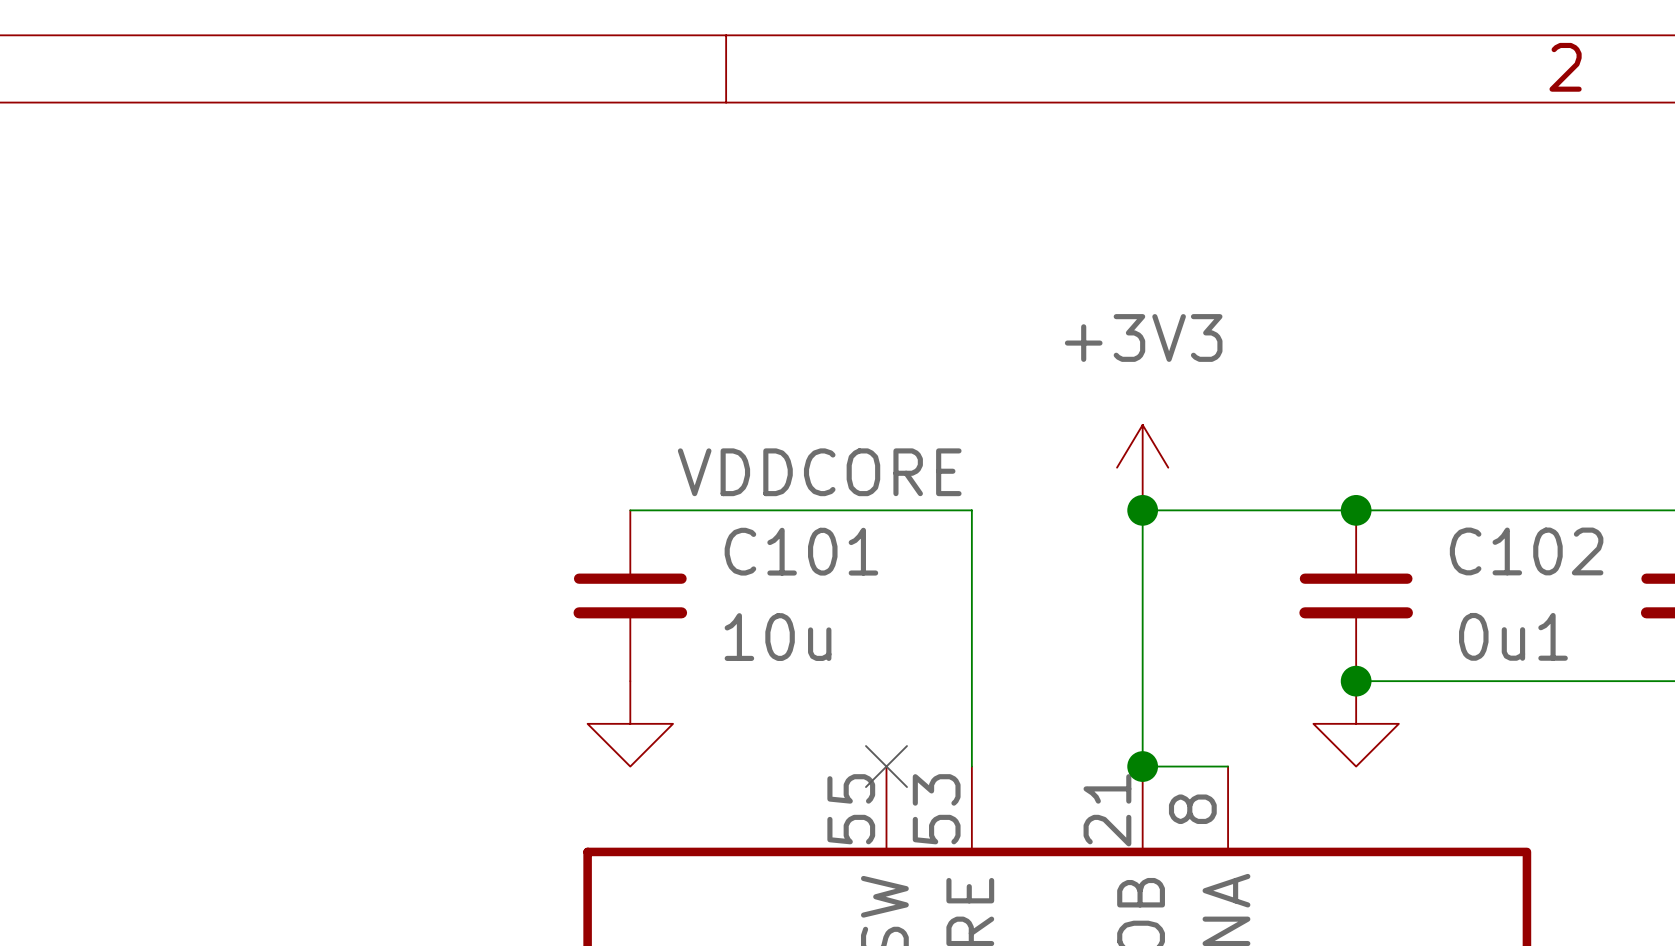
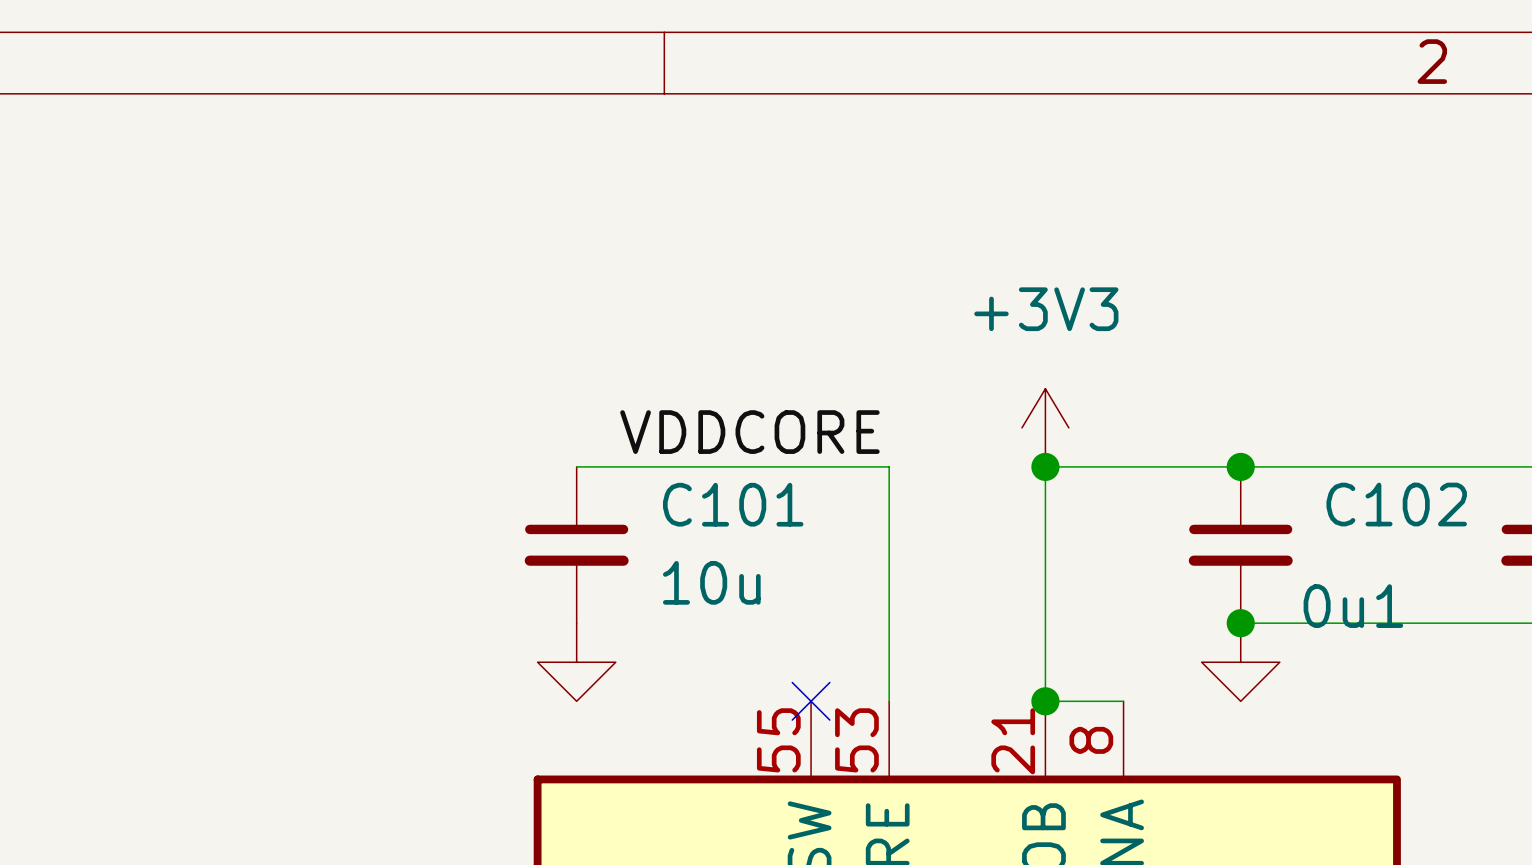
C102 value position: 0u1 (1513, 636) -> 0u1 (1353, 606)

